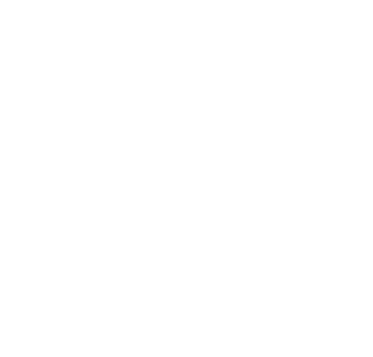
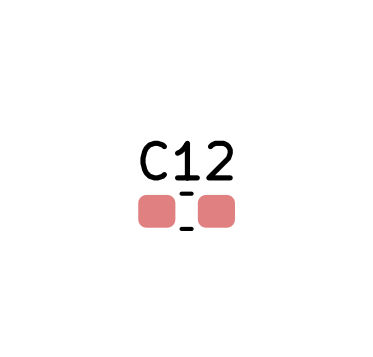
C12: none -> (186, 211)

